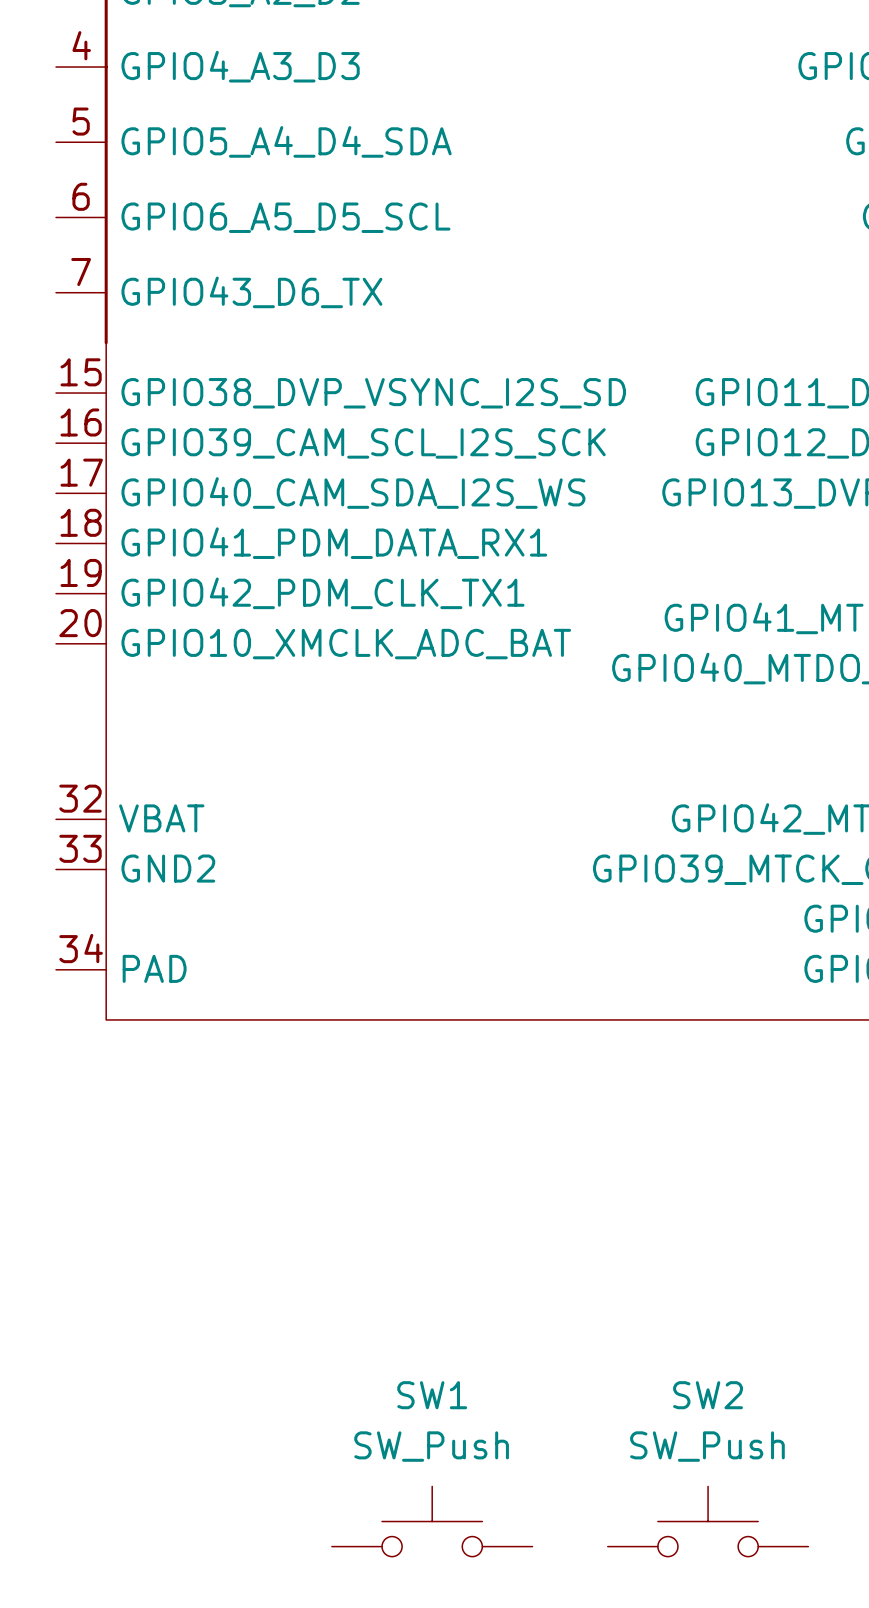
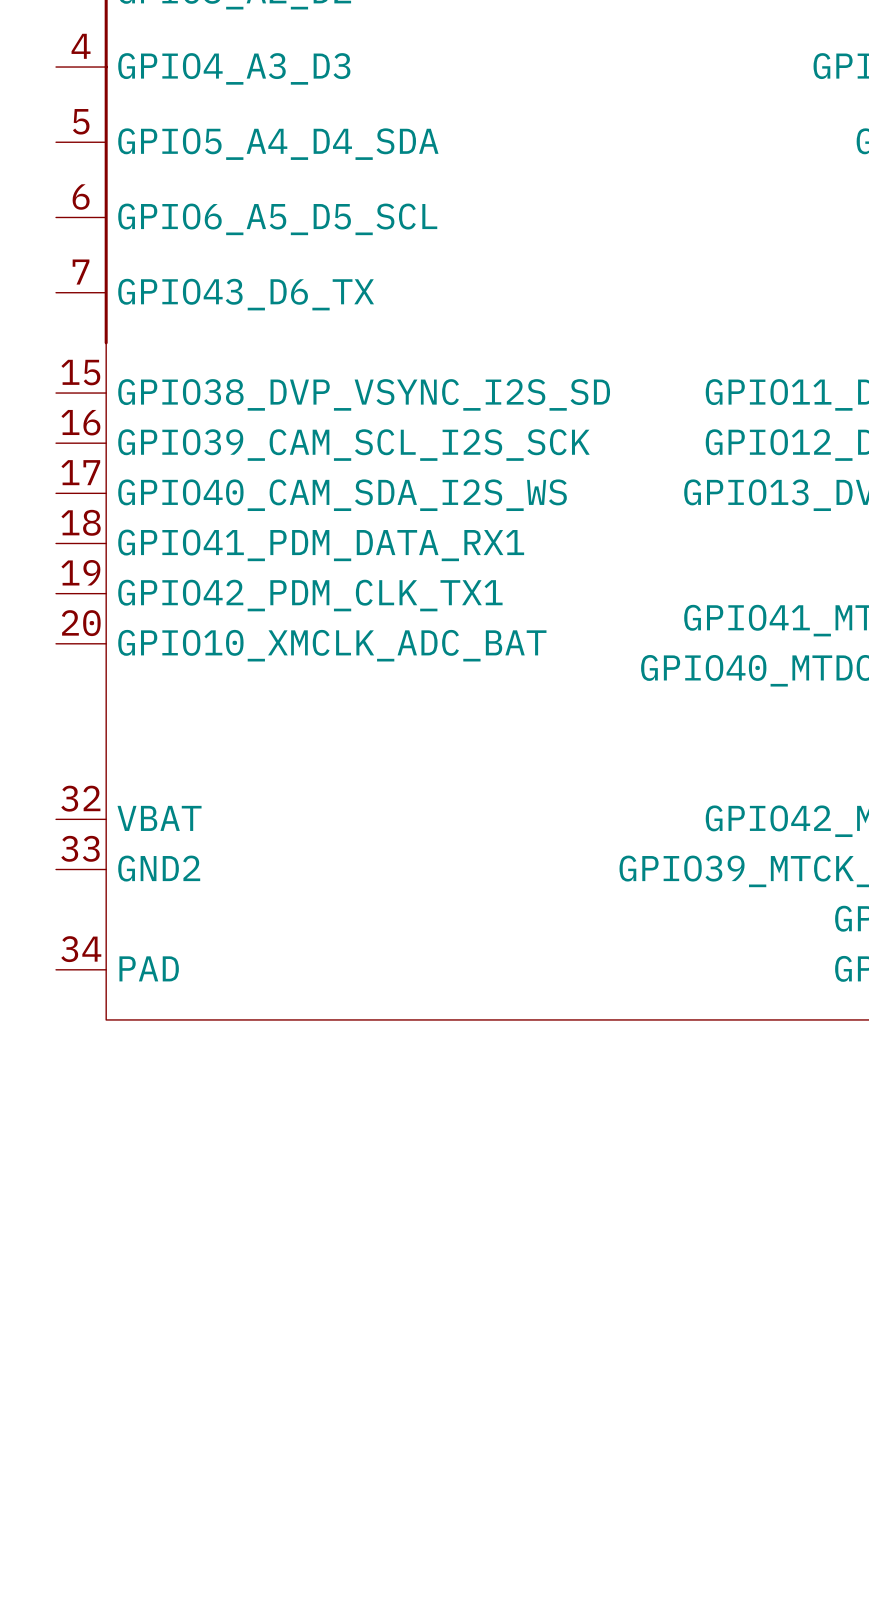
SW1: SW_Push (432, 1521) -> none
SW2: SW_Push (708, 1521) -> none

